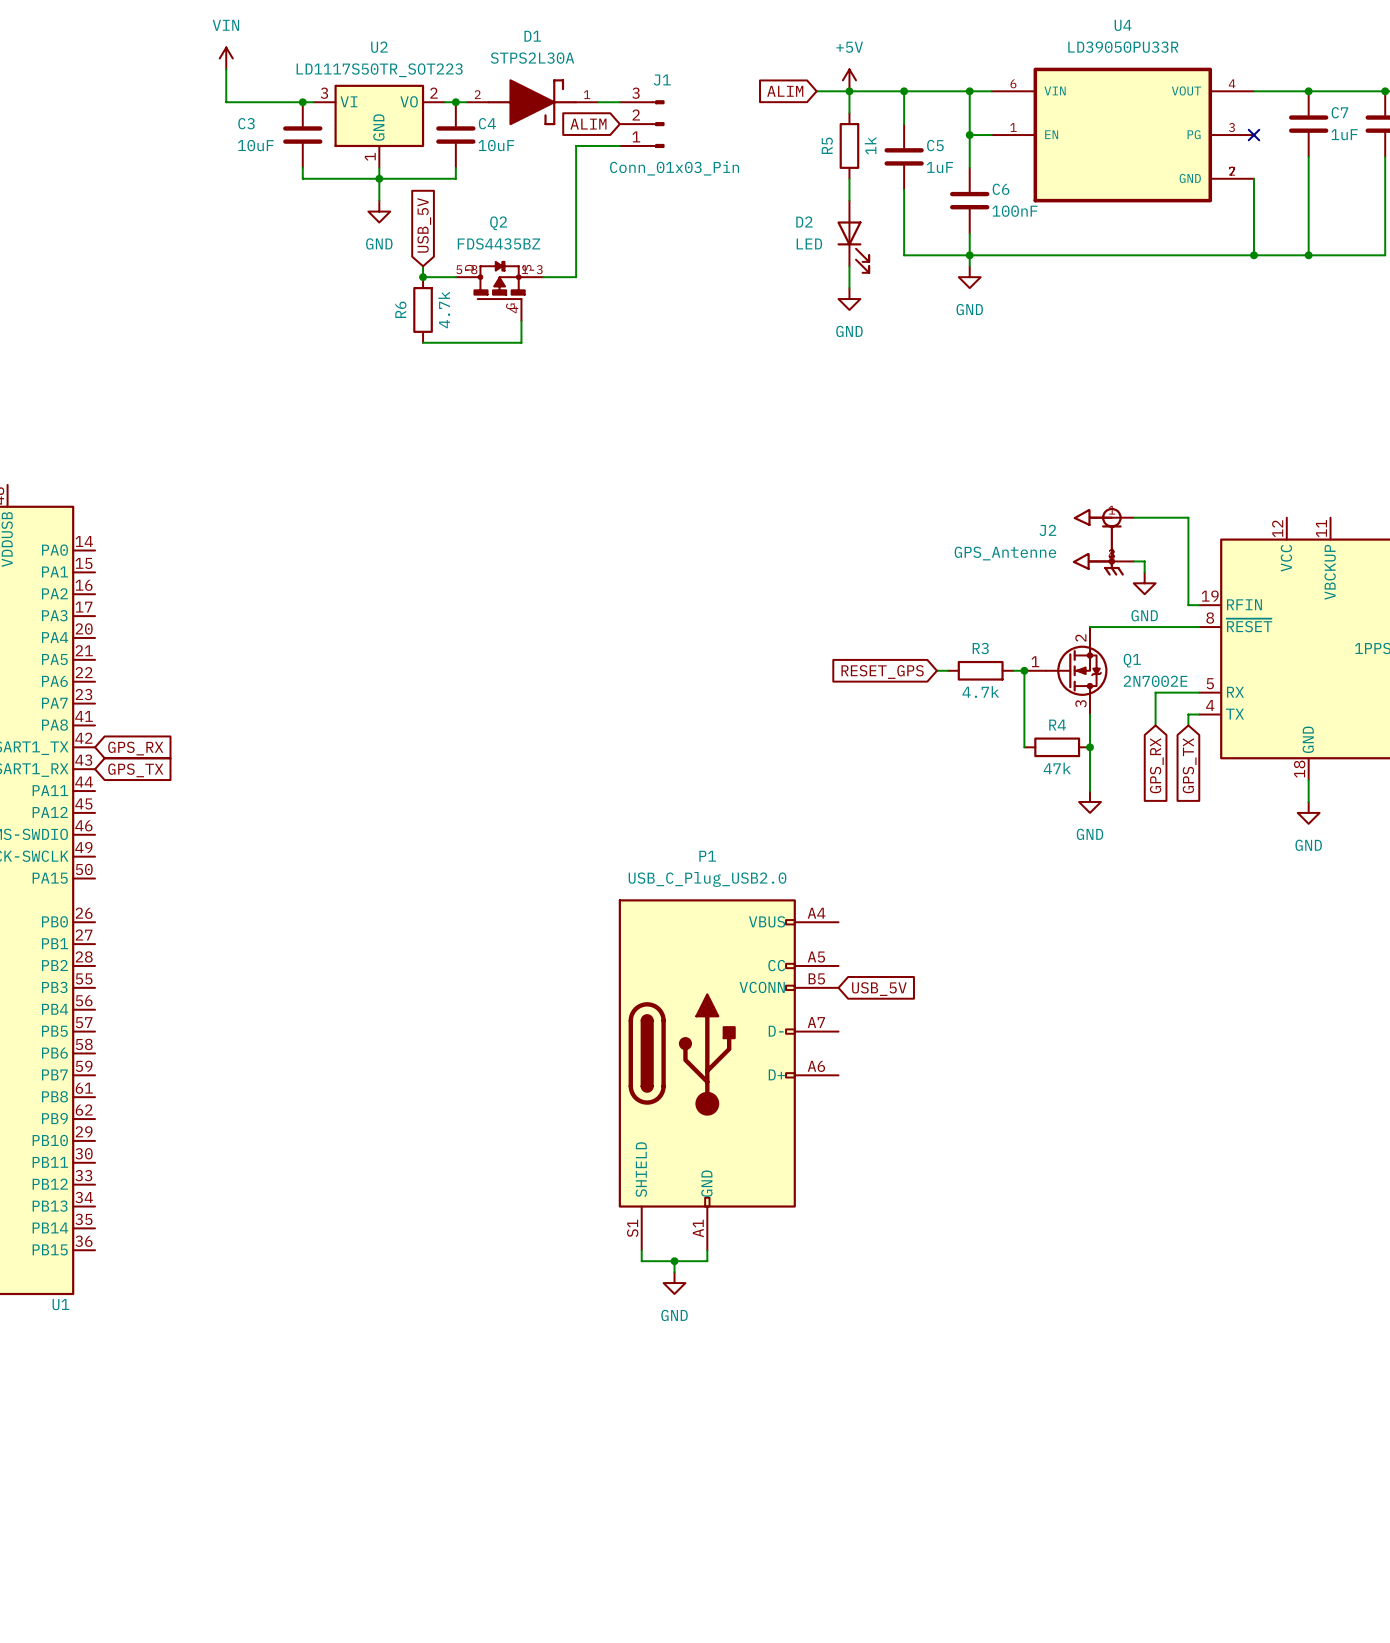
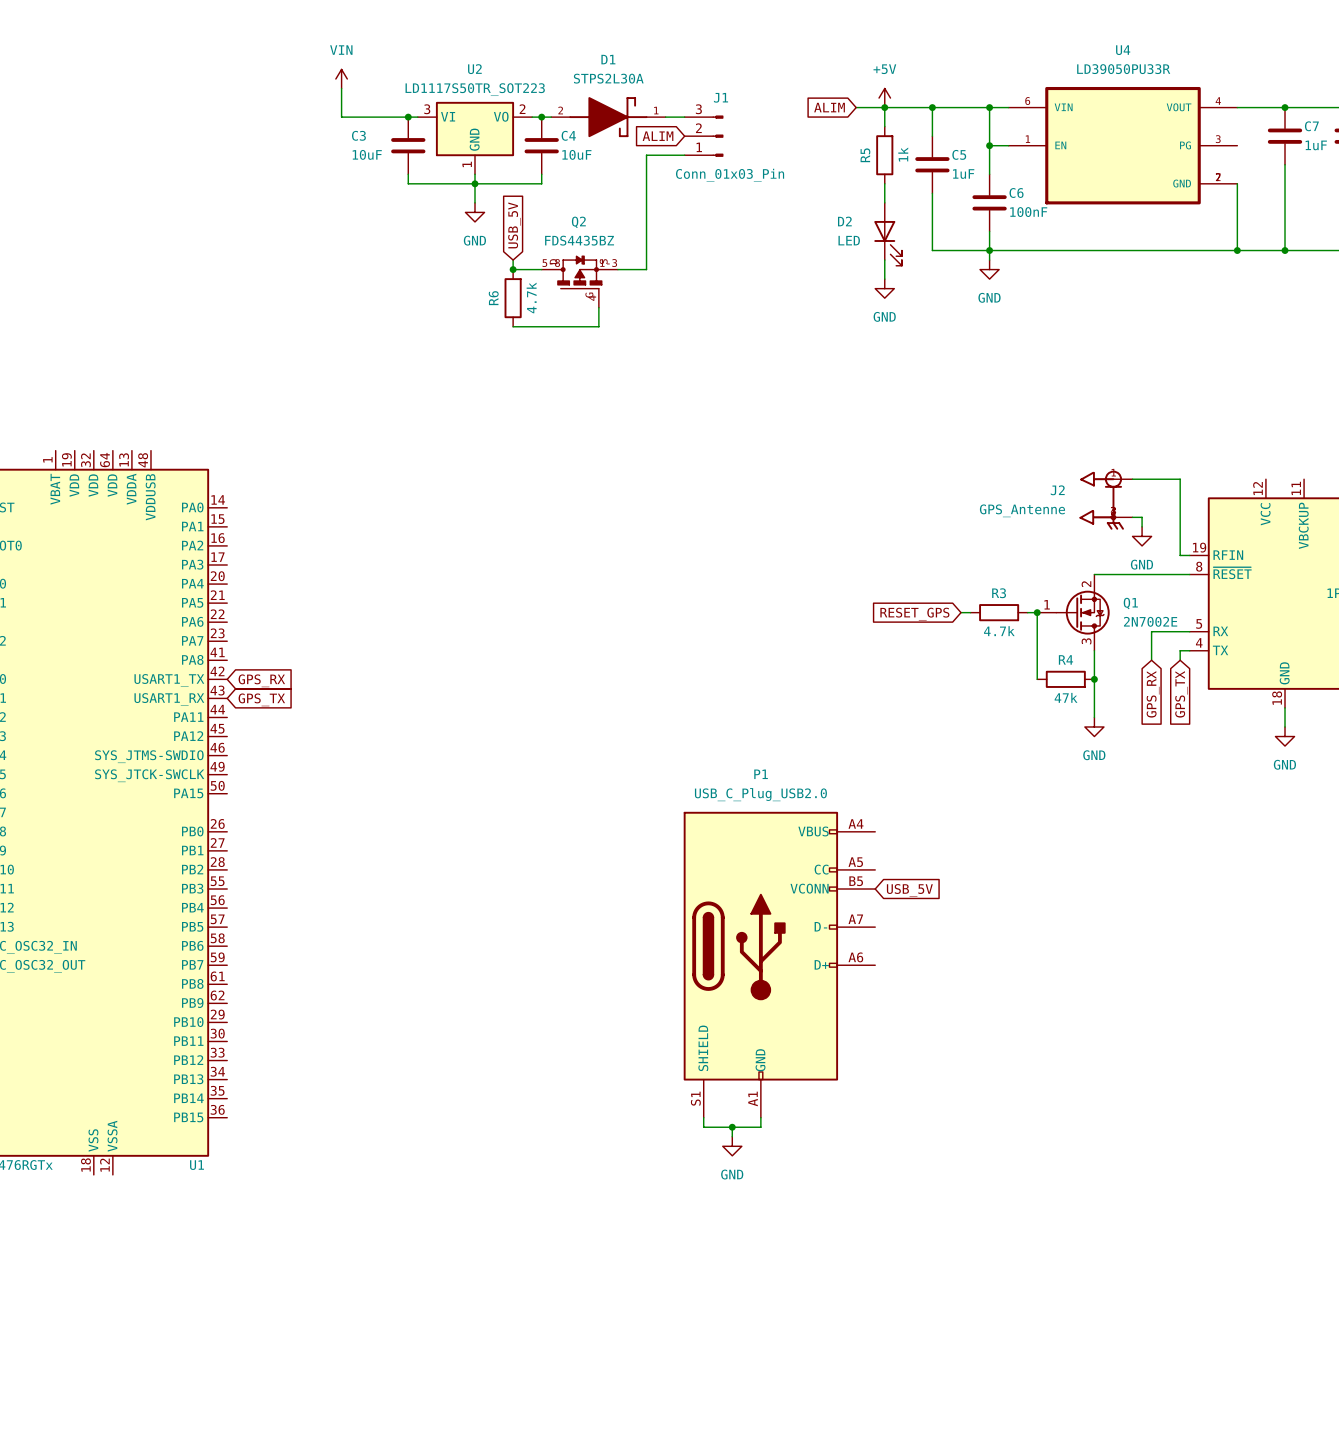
no-connect mark: (1254, 135) -> none

